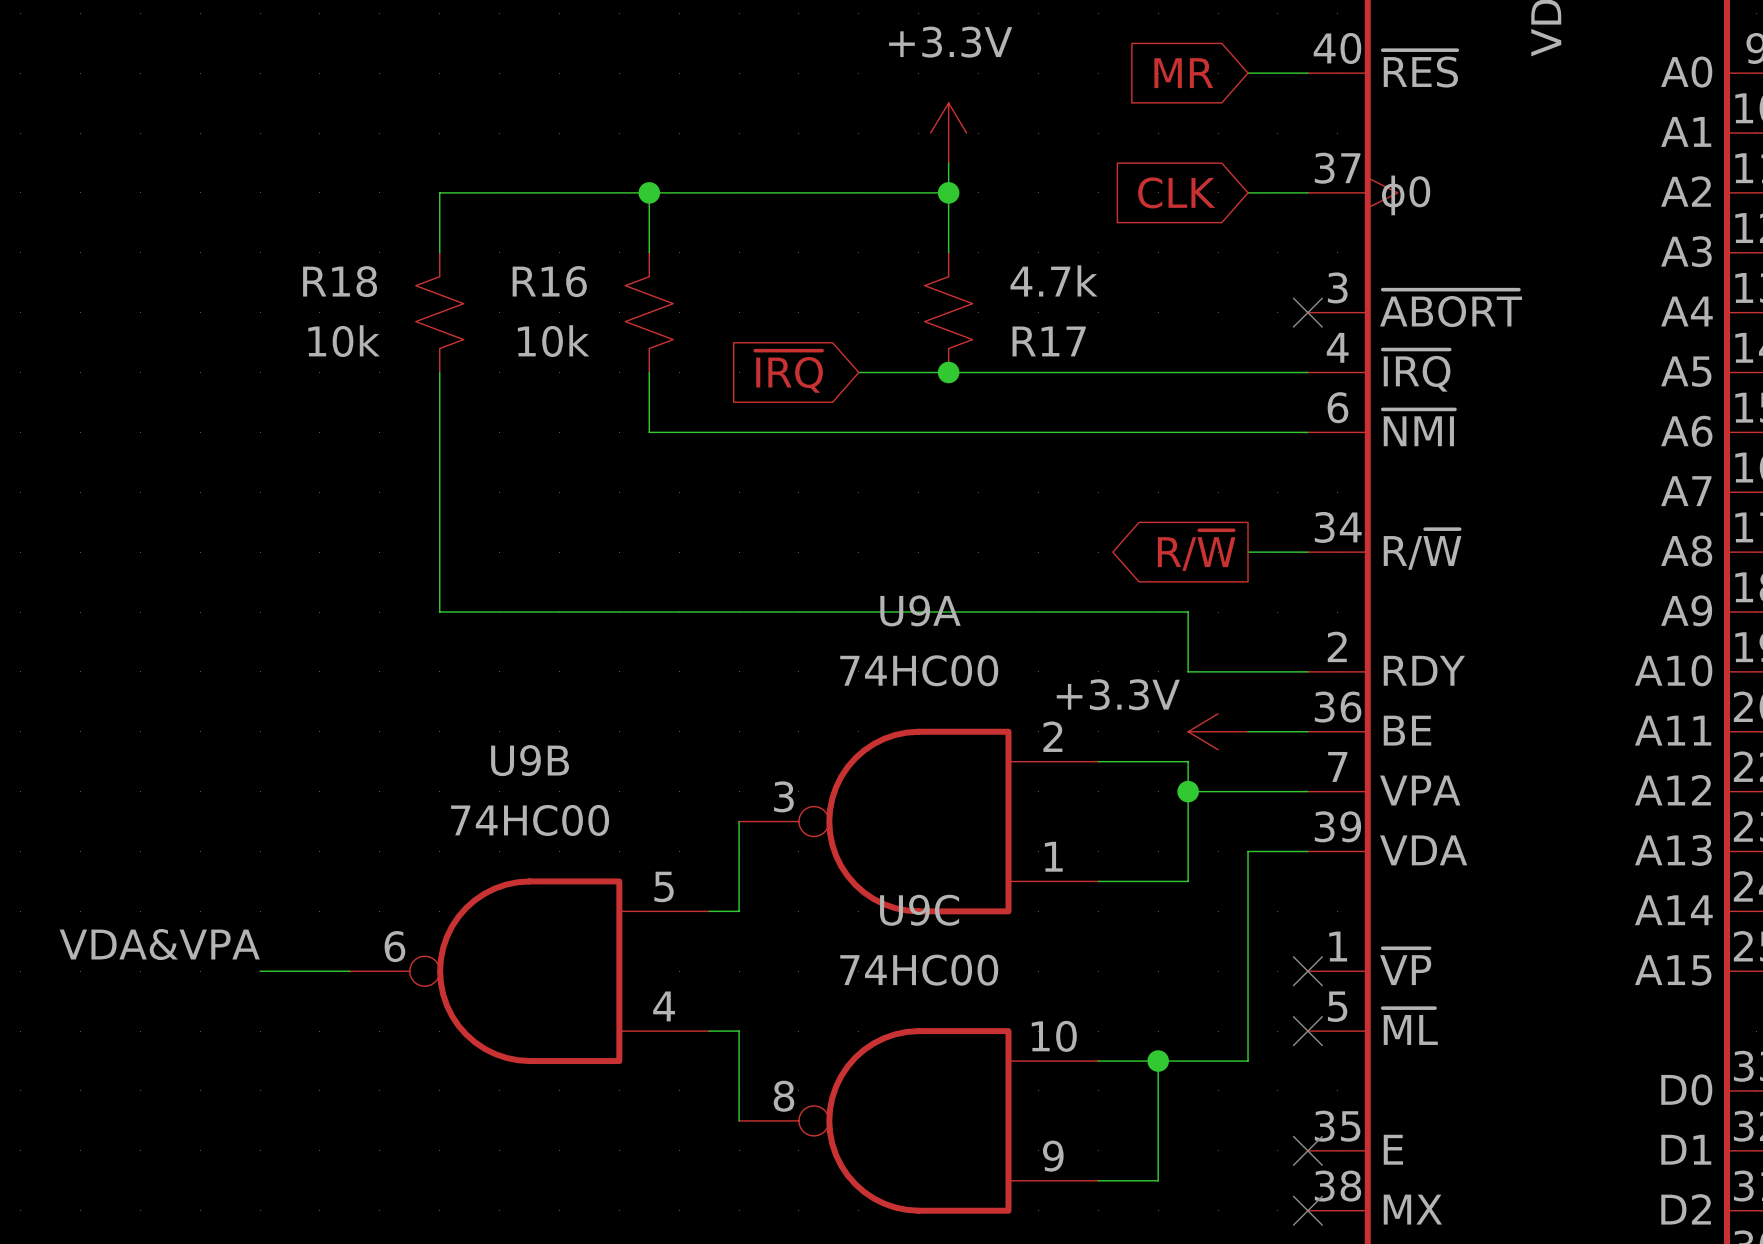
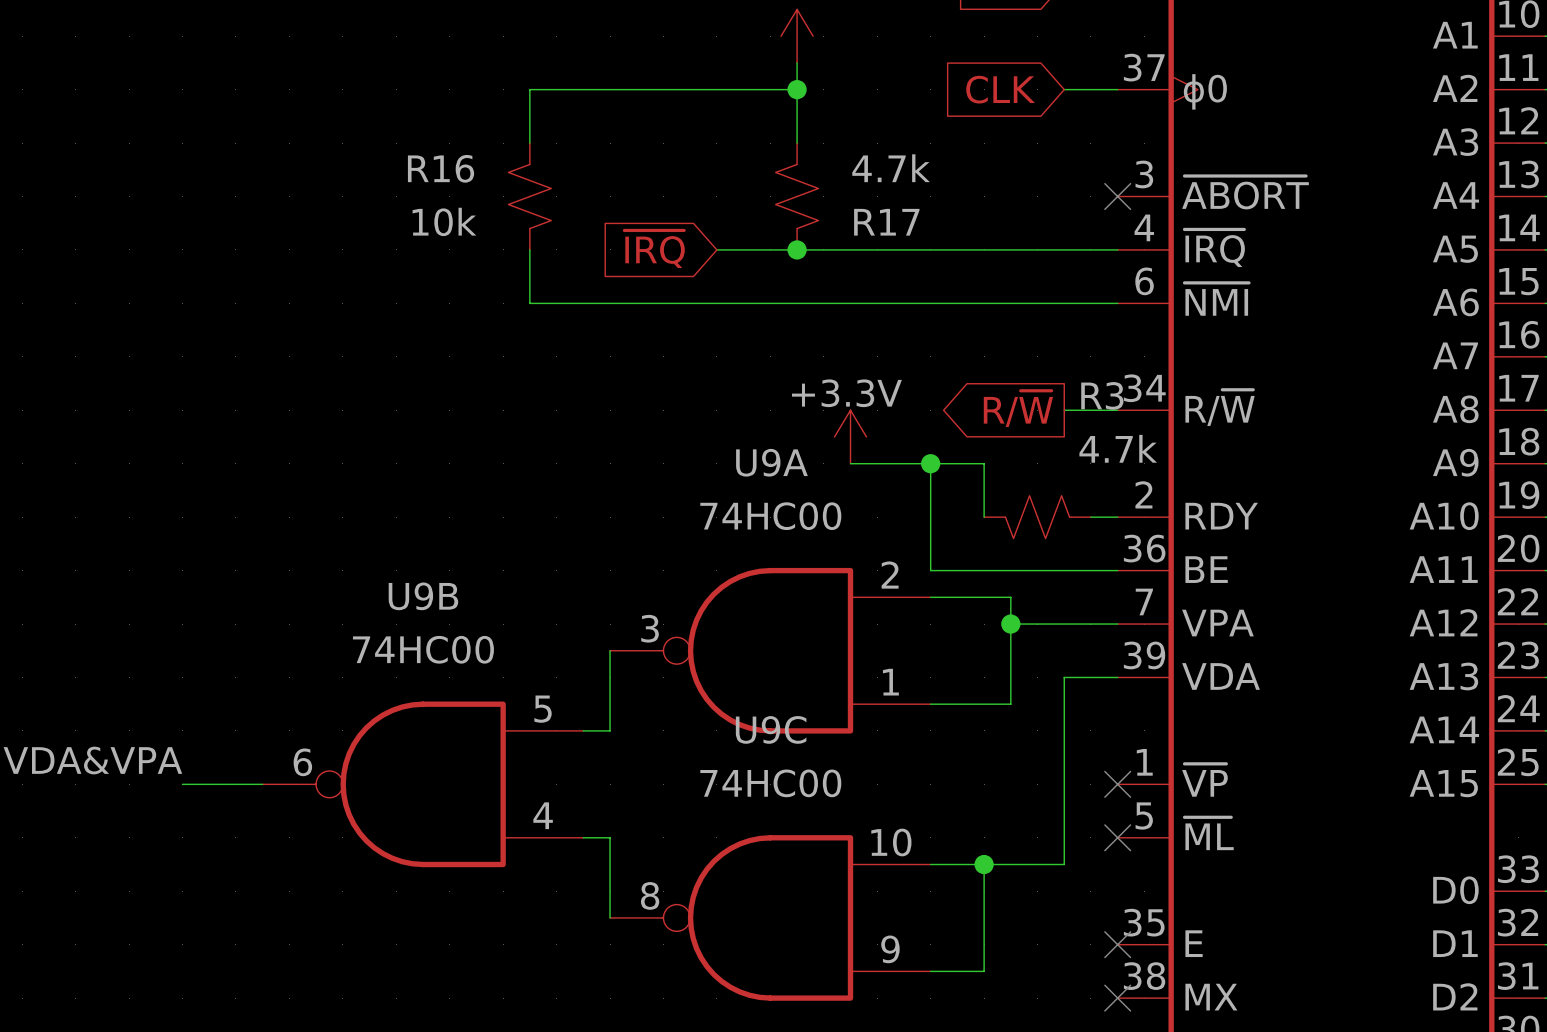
wire: (649, 192) (439, 192) (439, 252) -> none
junction: (649, 192) -> none
R18: 10k (439, 312) -> none
wire: (439, 372) (439, 612) (1008, 612) -> none
wire: none -> (930, 463) (930, 570) (1064, 570)
junction: none -> (930, 463)
wire: (1158, 612) (1188, 612) (1188, 671) (1277, 671) -> (984, 463) (984, 517)
R3: none -> 4.7k (1037, 517)
power symbol text position: +3.3V (1118, 694) -> +3.3V (846, 393)
power symbol rotation: 0° (1218, 731) -> 90° clockwise (850, 436)
power symbol position: +3.3V (1218, 731) -> +3.3V (850, 436)

